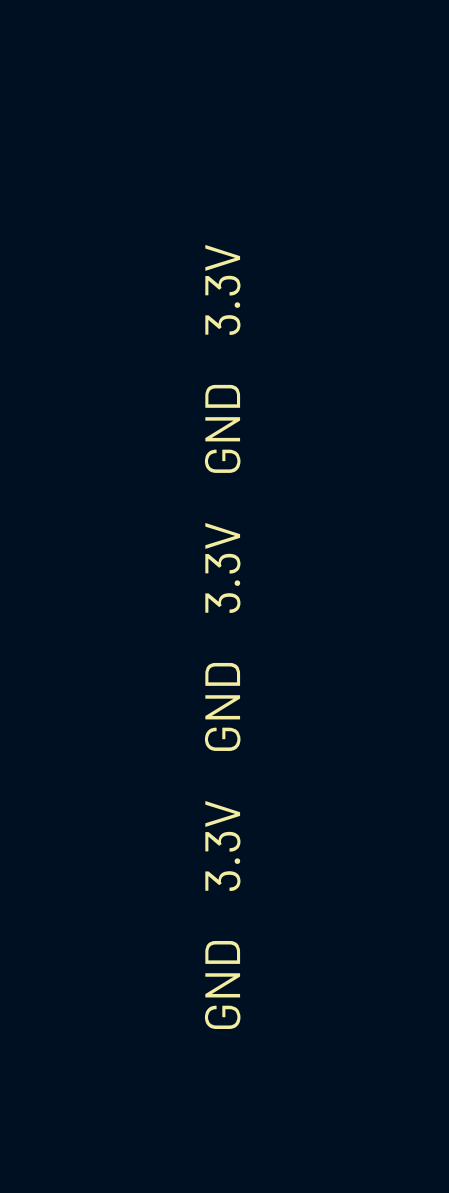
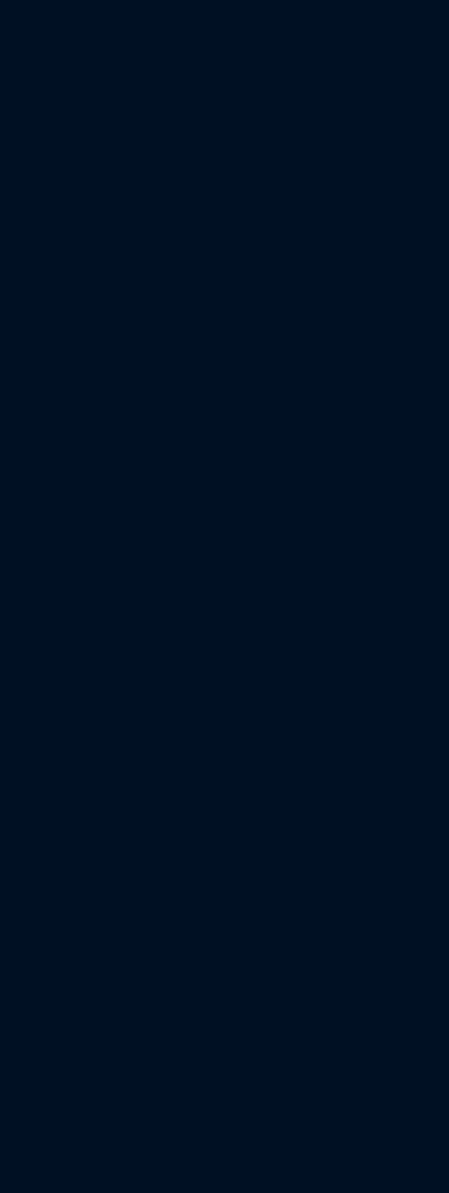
text: 3.3V (222, 289) -> none
text: GND (222, 428) -> none
text: 3.3V (222, 568) -> none
text: GND (222, 706) -> none
text: 3.3V (222, 846) -> none
text: GND (222, 984) -> none

